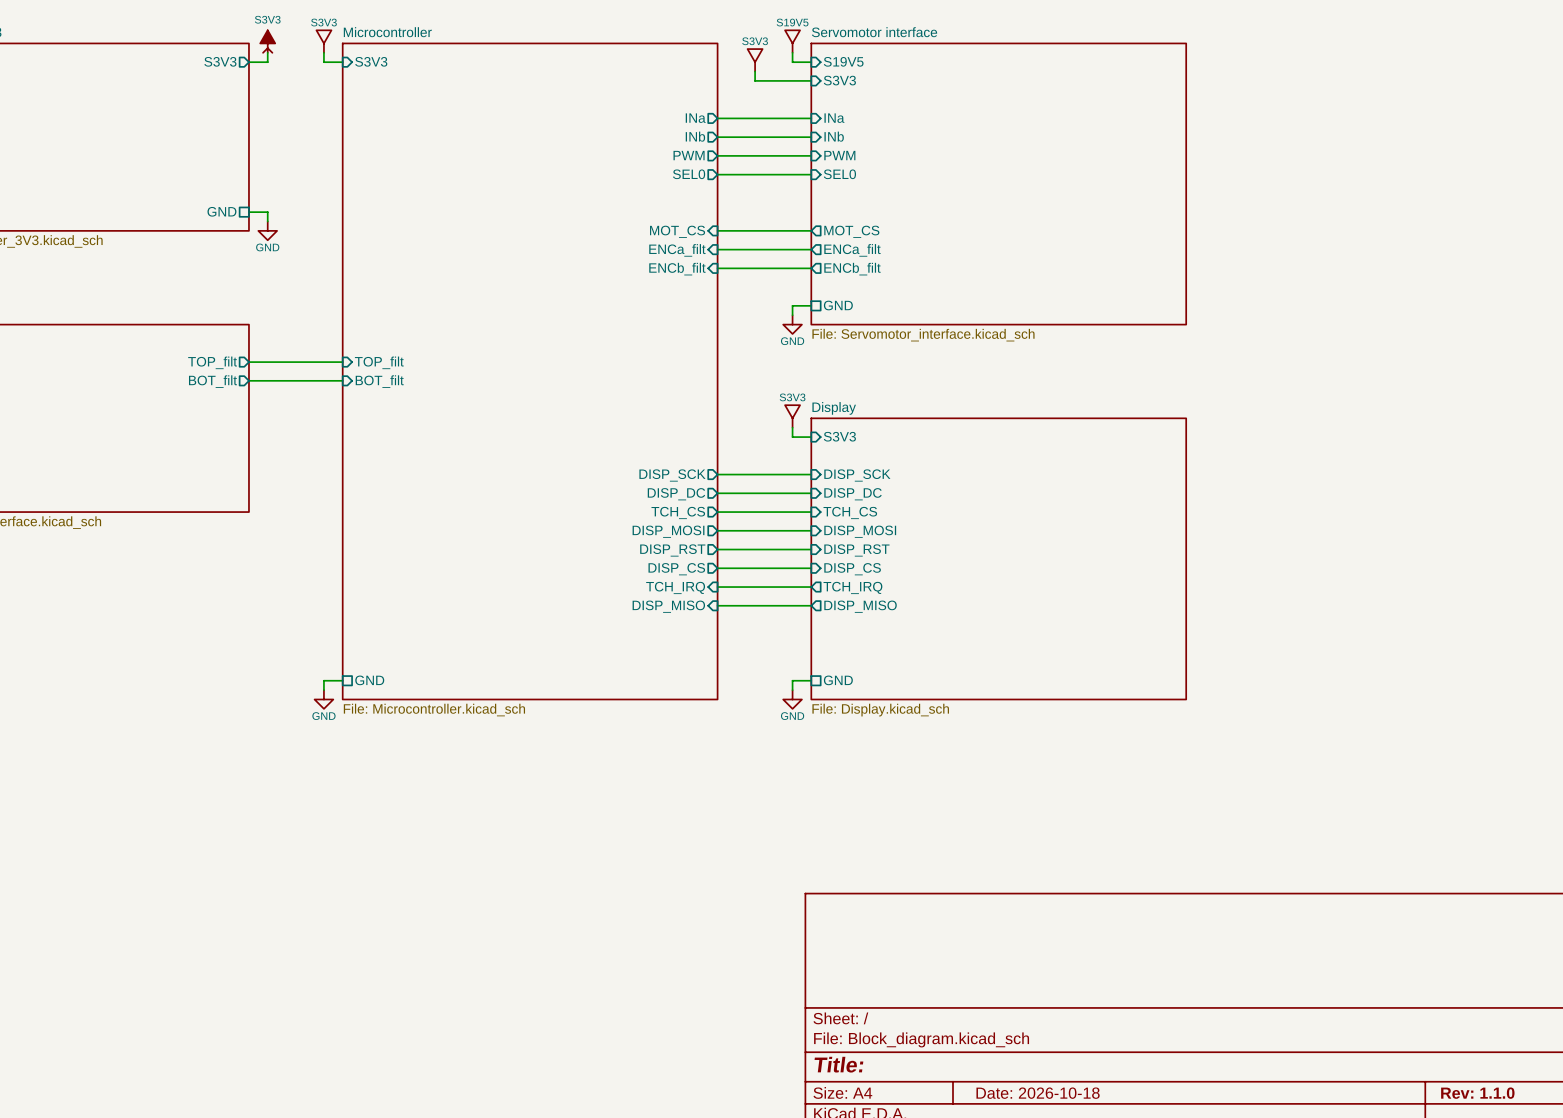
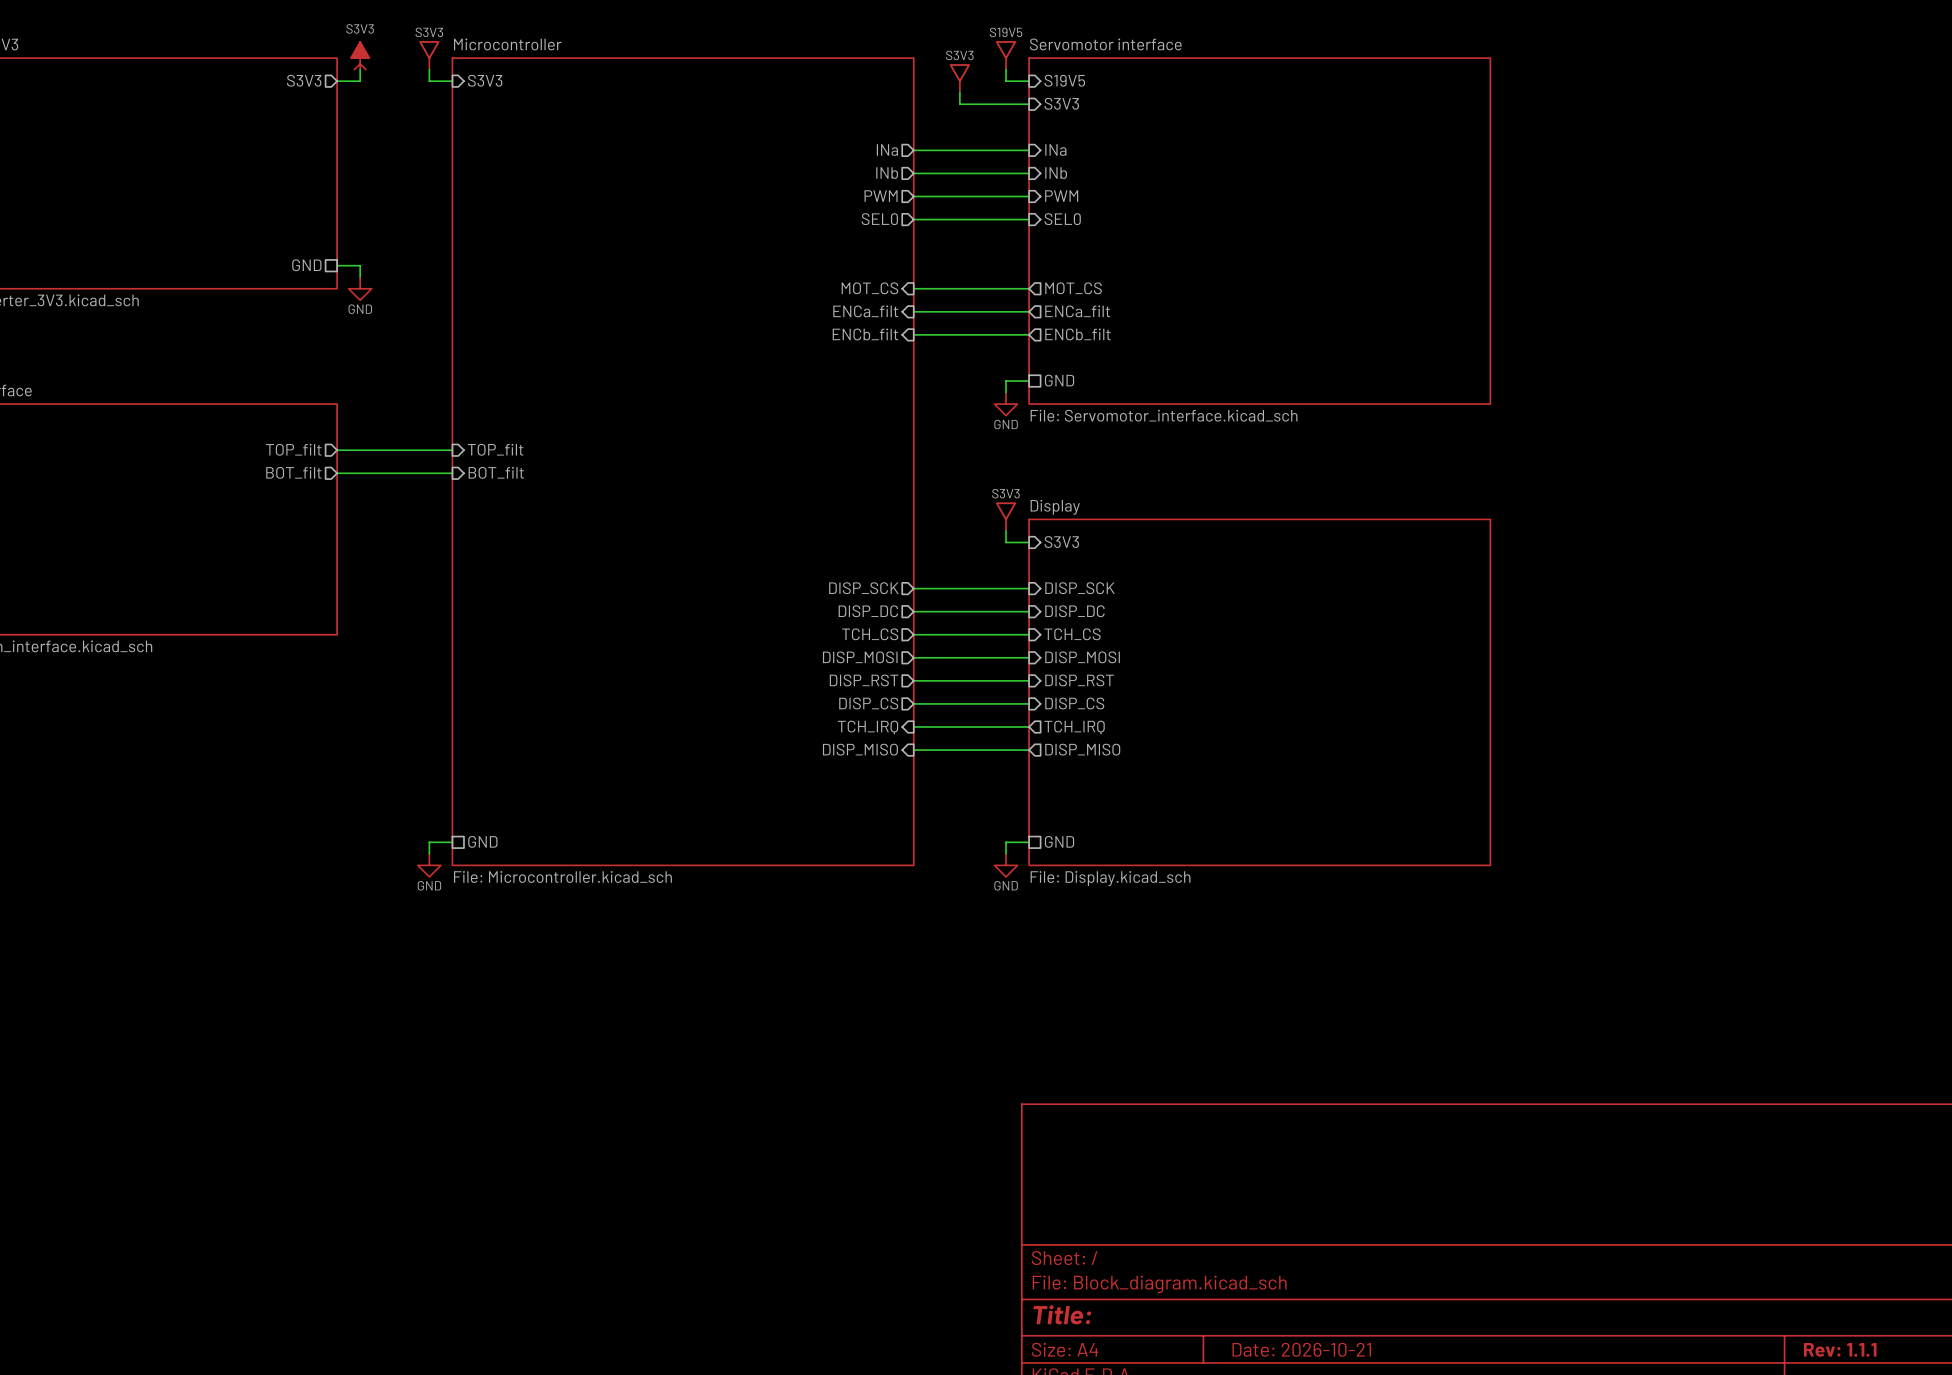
title block: Date: 2026-10-18 (1038, 1093) -> Date: 2026-10-21 (1301, 1349)
title block: Rev: 1.1.0 (1477, 1093) -> Rev: 1.1.1 (1840, 1349)

